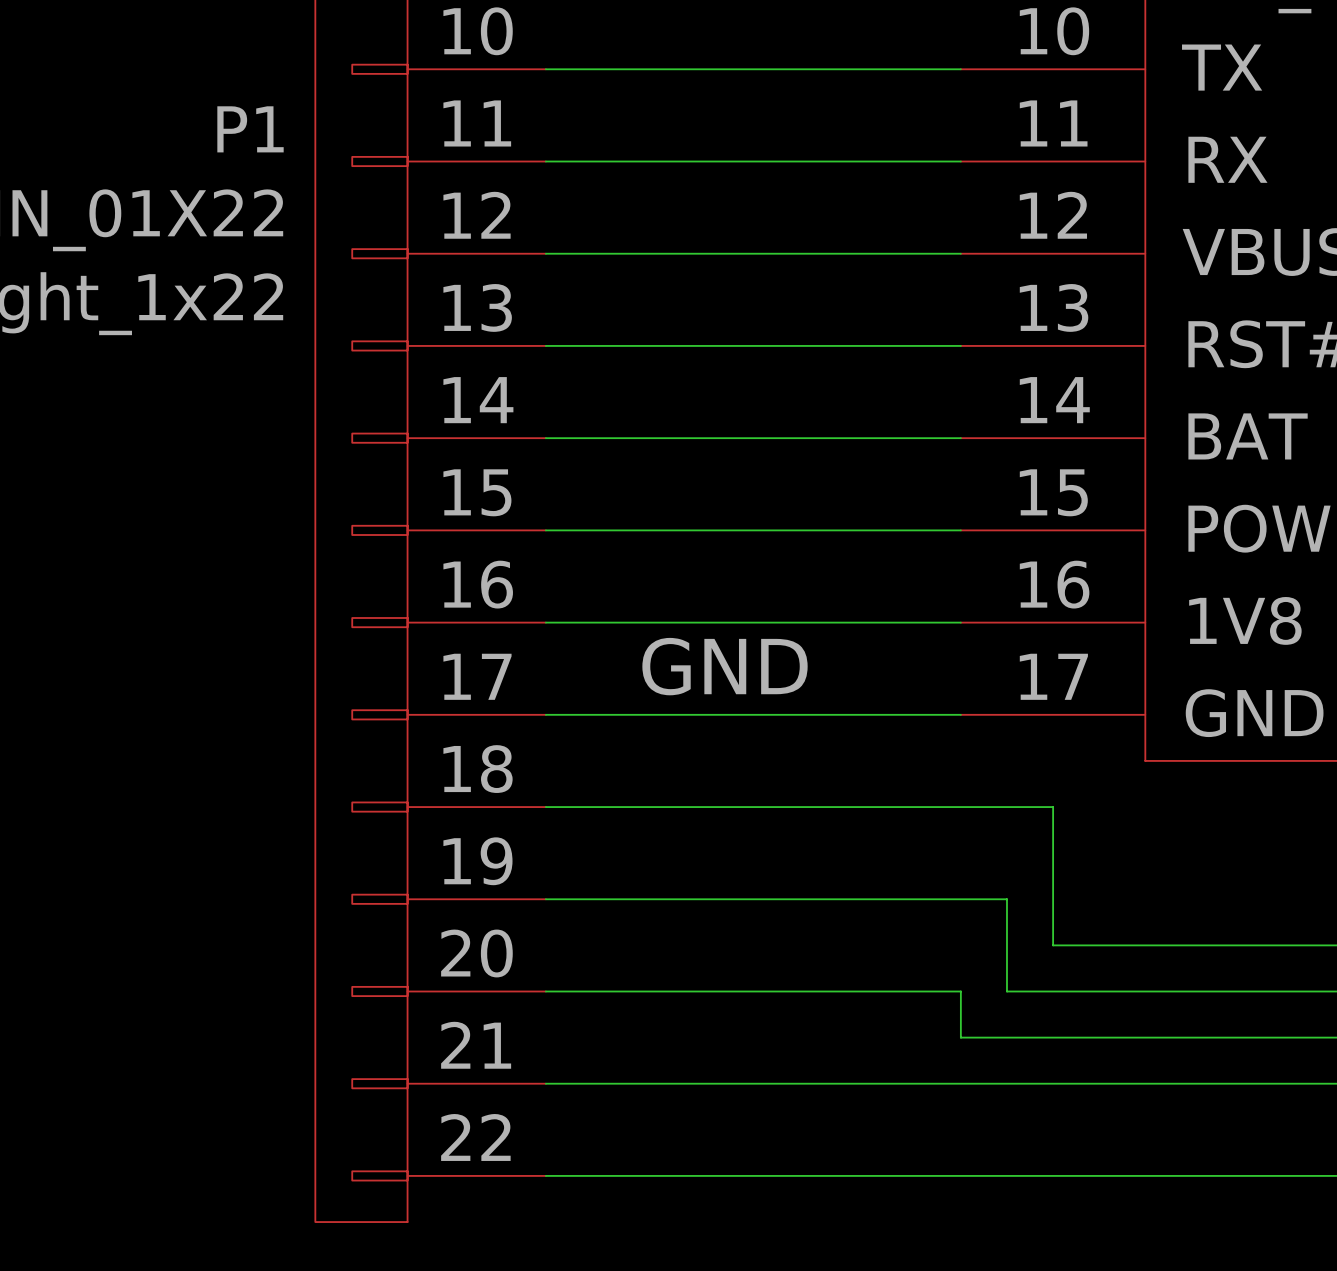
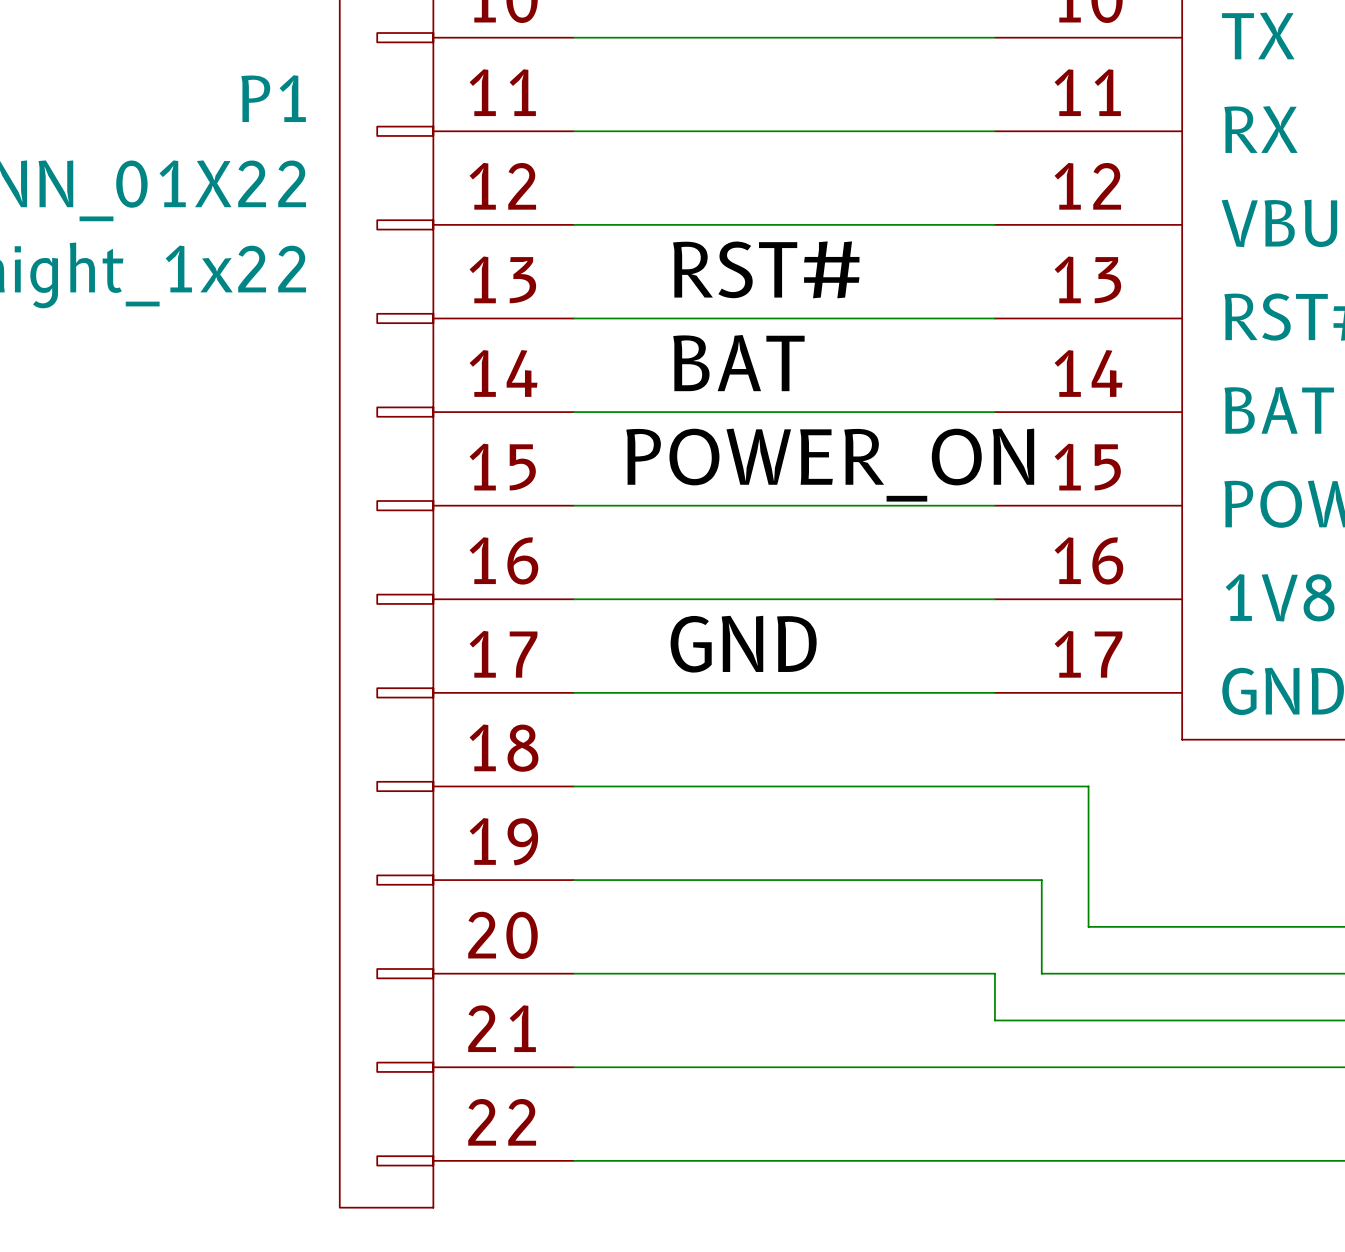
label: none -> RST# (766, 269)
label: none -> BAT (738, 363)
label: none -> POWER_ON (830, 465)

